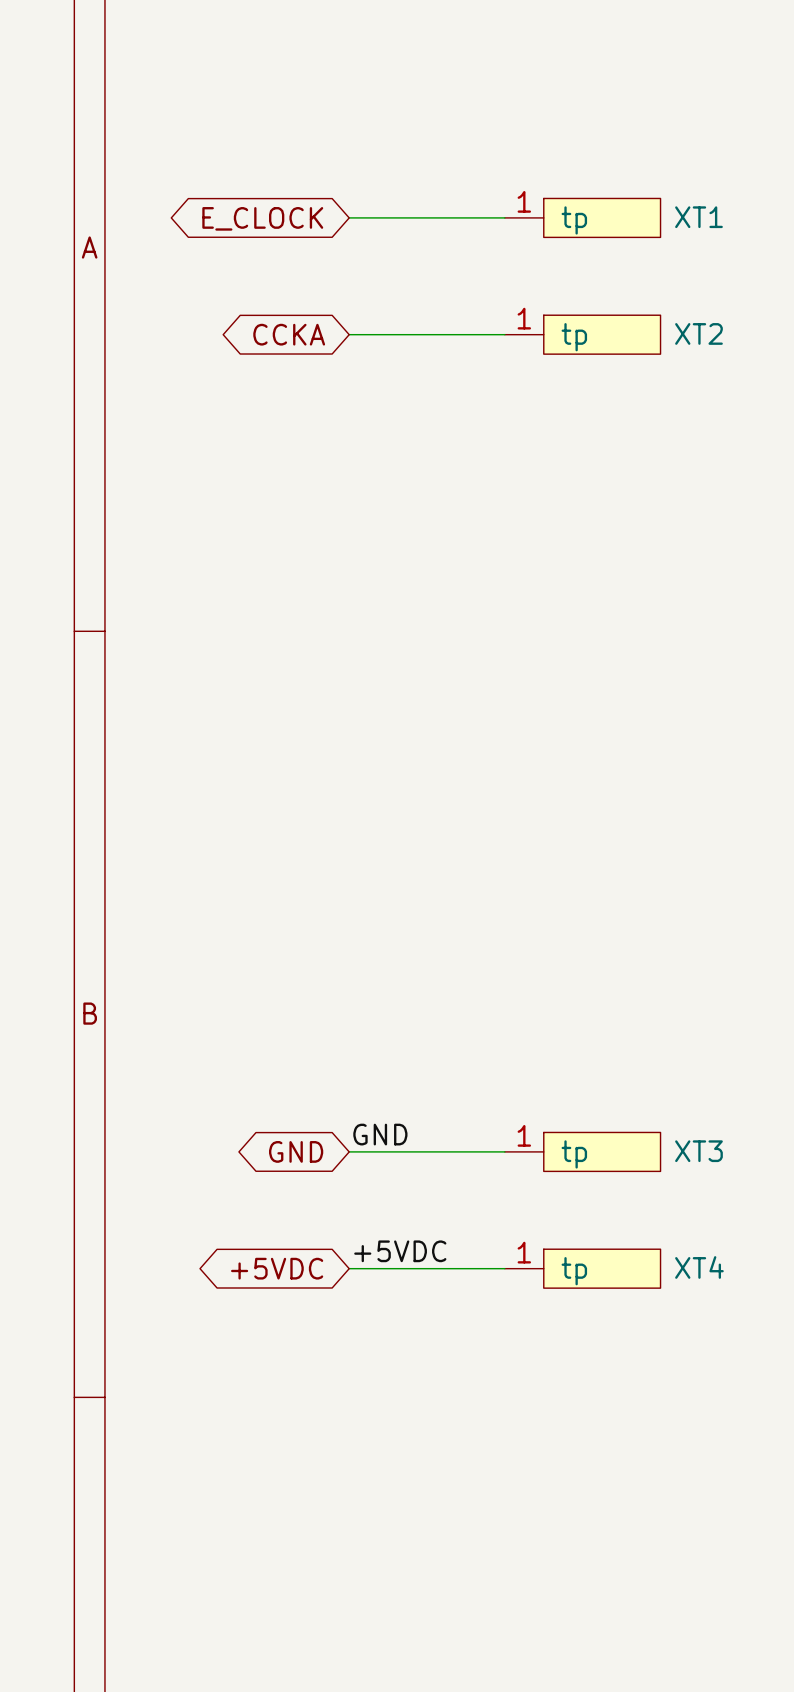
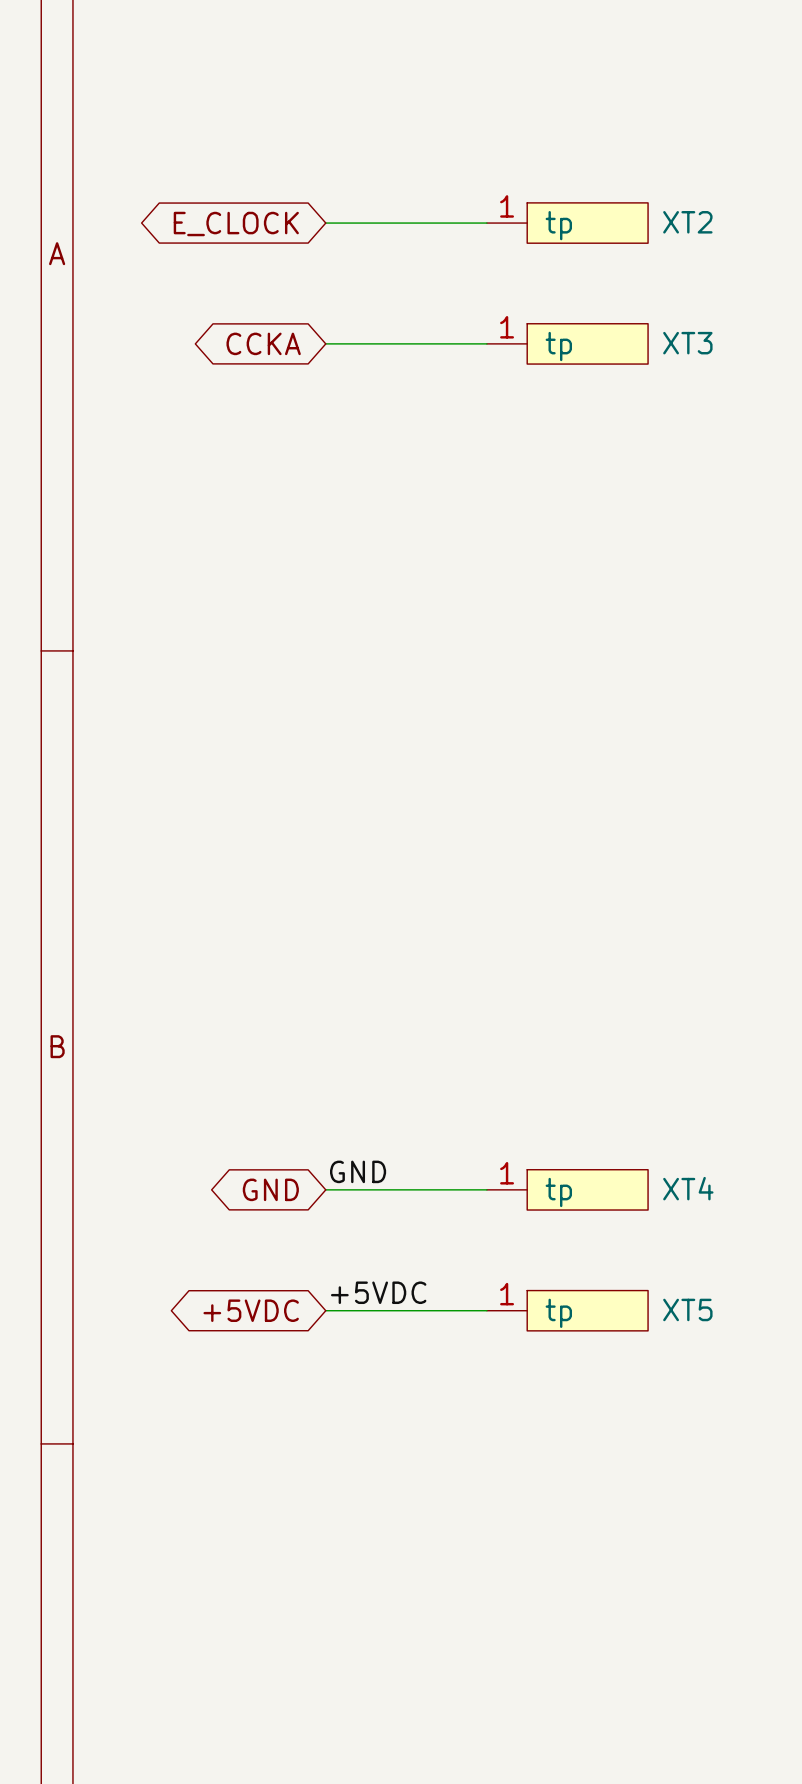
XT1 name: XT1 (698, 217) -> XT2 (687, 222)
XT2 name: XT2 (698, 333) -> XT3 (687, 343)
XT3 name: XT3 (698, 1151) -> XT4 (688, 1188)
XT4 name: XT4 (699, 1267) -> XT5 (687, 1309)

